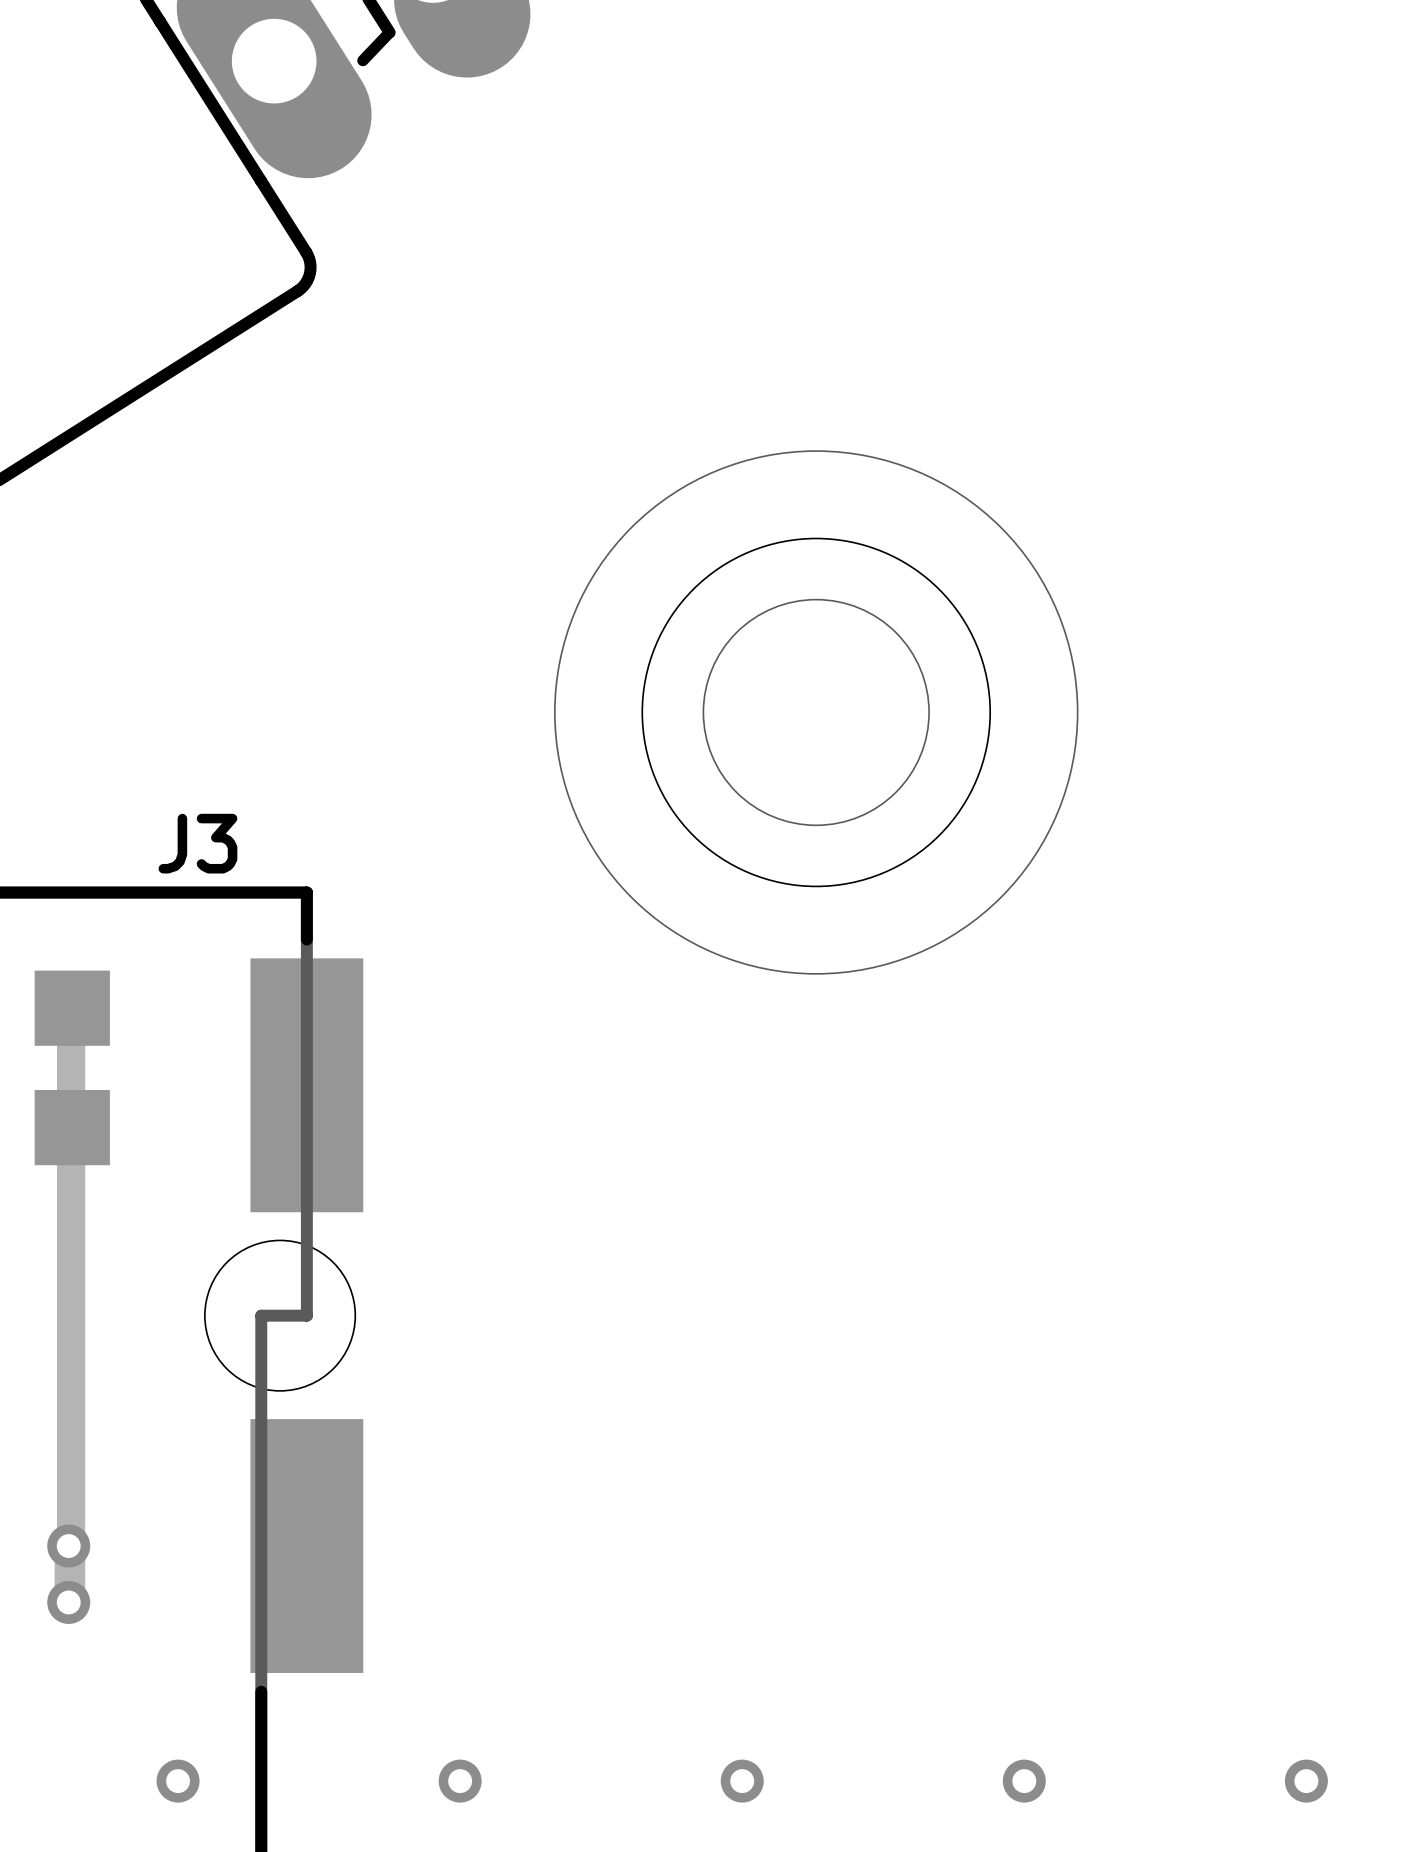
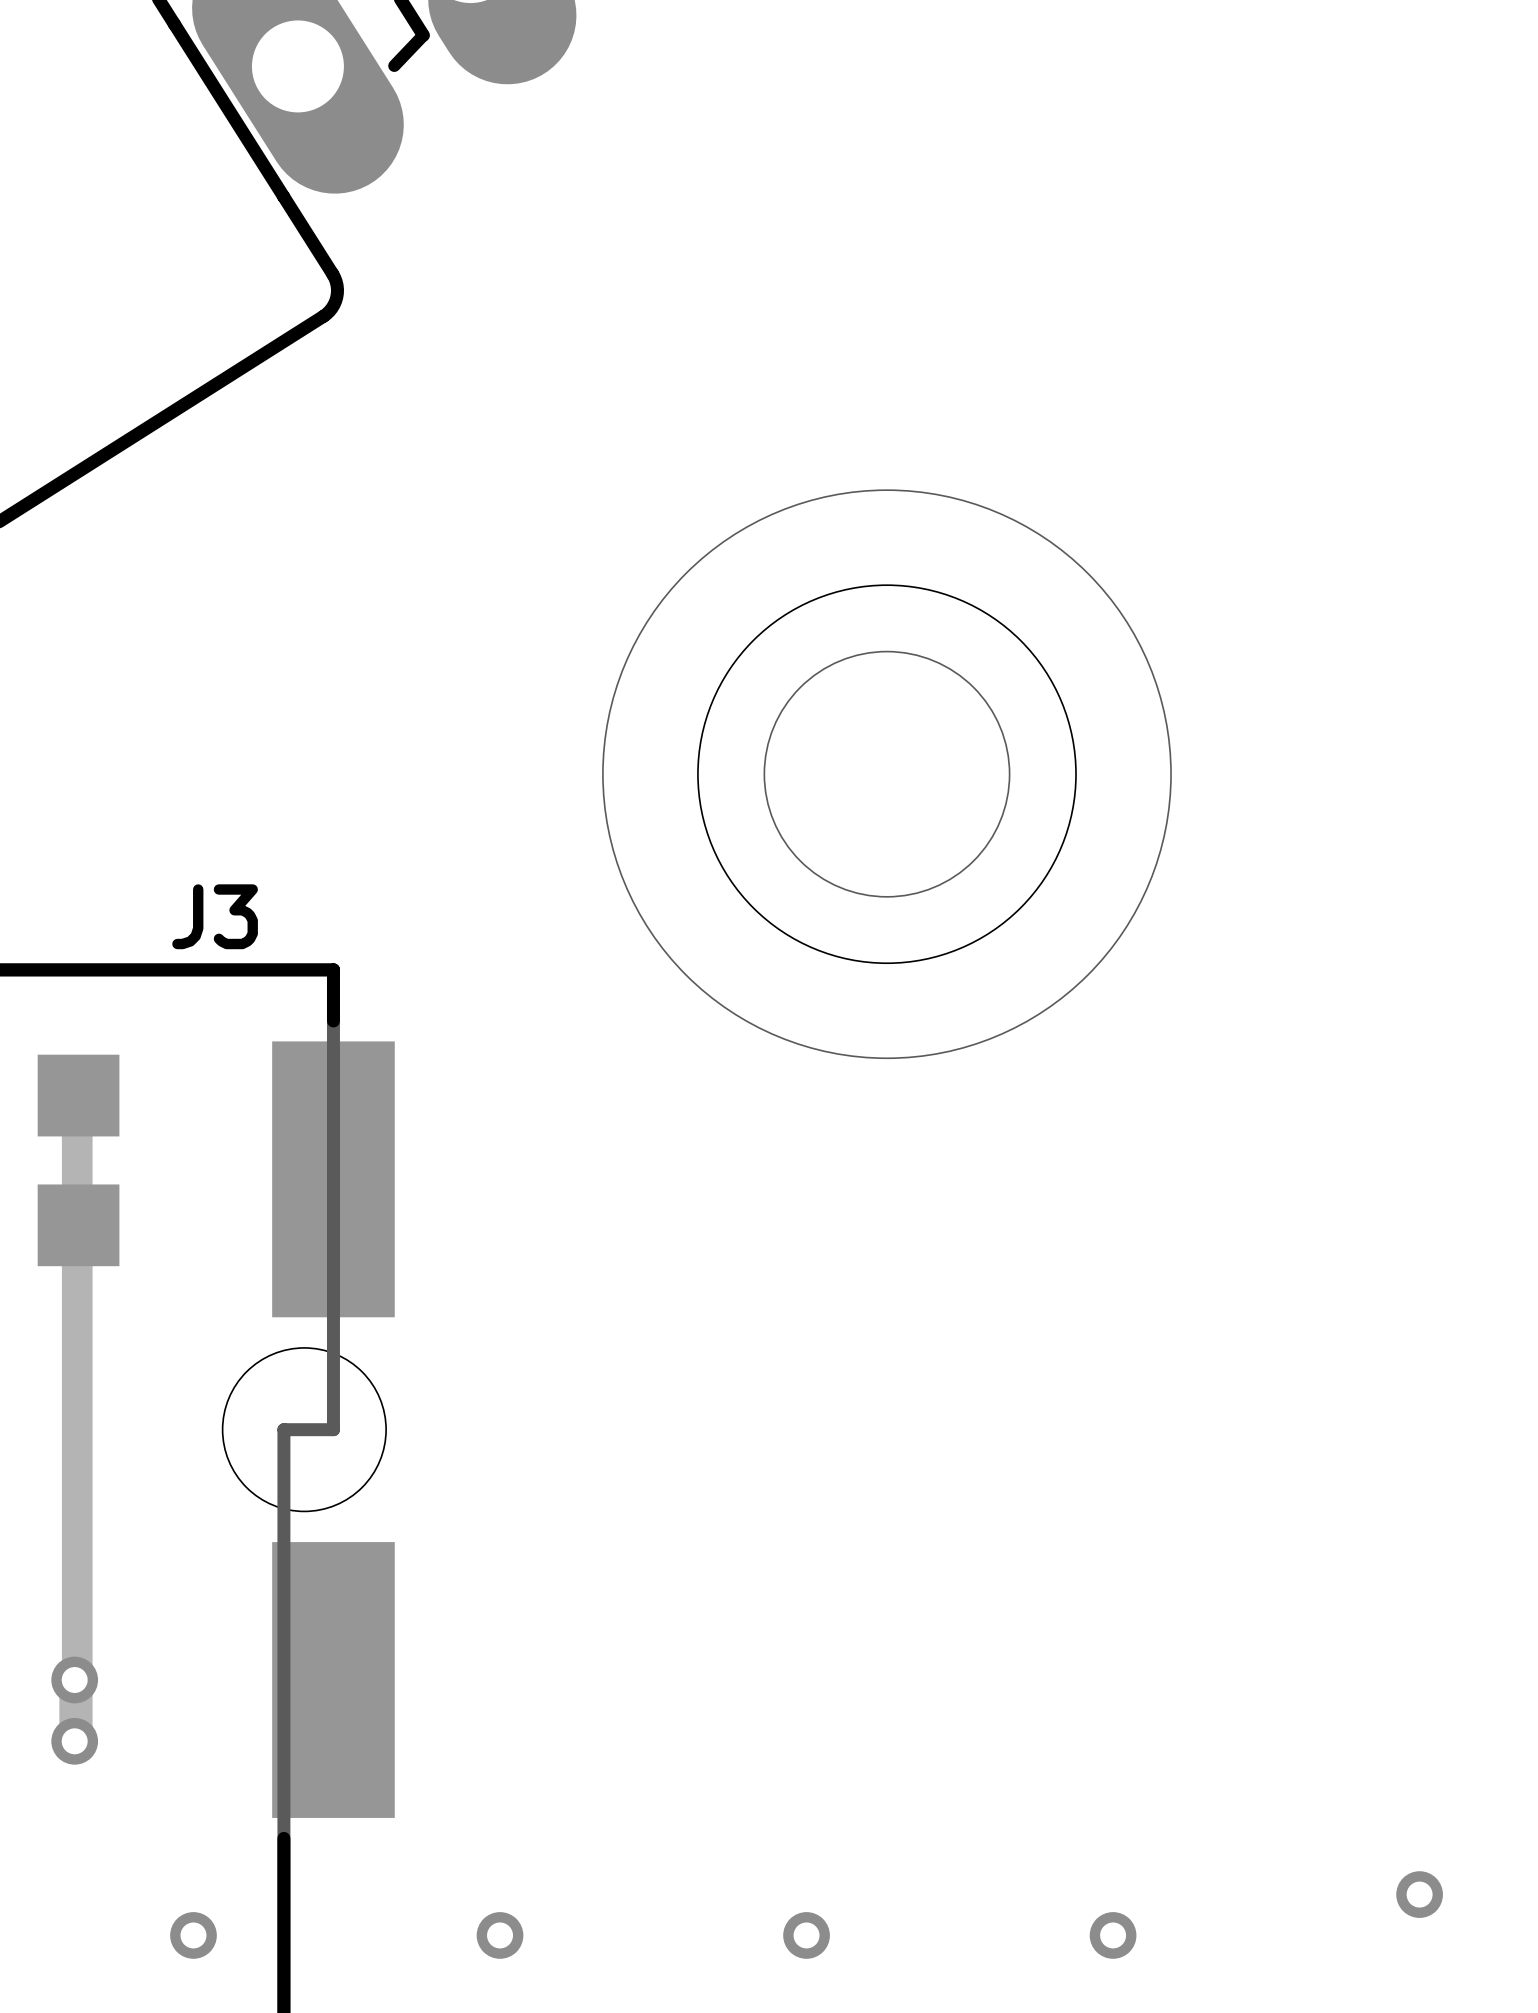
via position: (1306, 1781) -> (1419, 1894)

